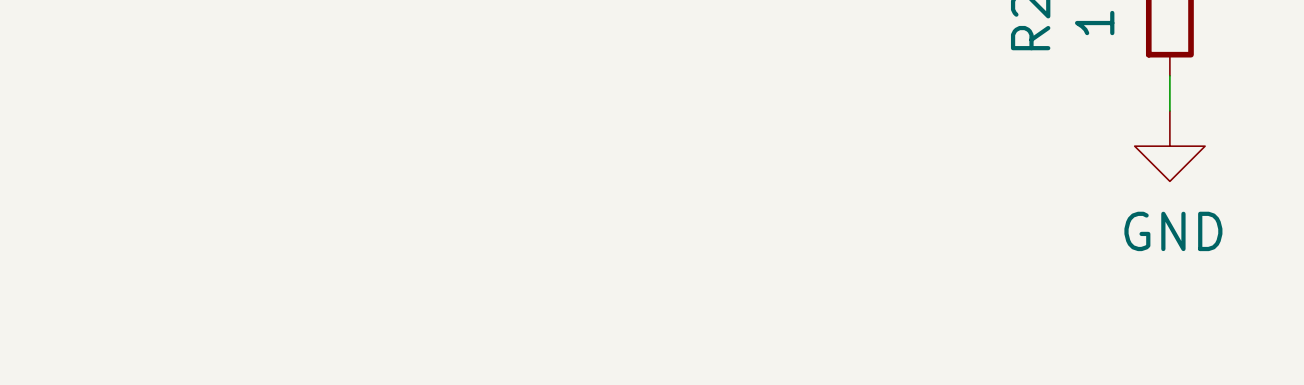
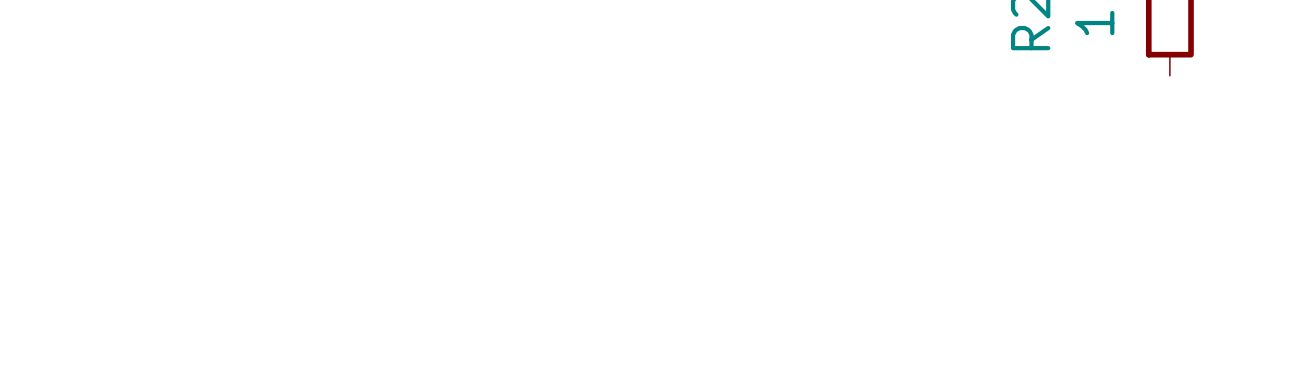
wire: (1169, 75) (1169, 110) -> none
power symbol: GND (1169, 146) -> none

